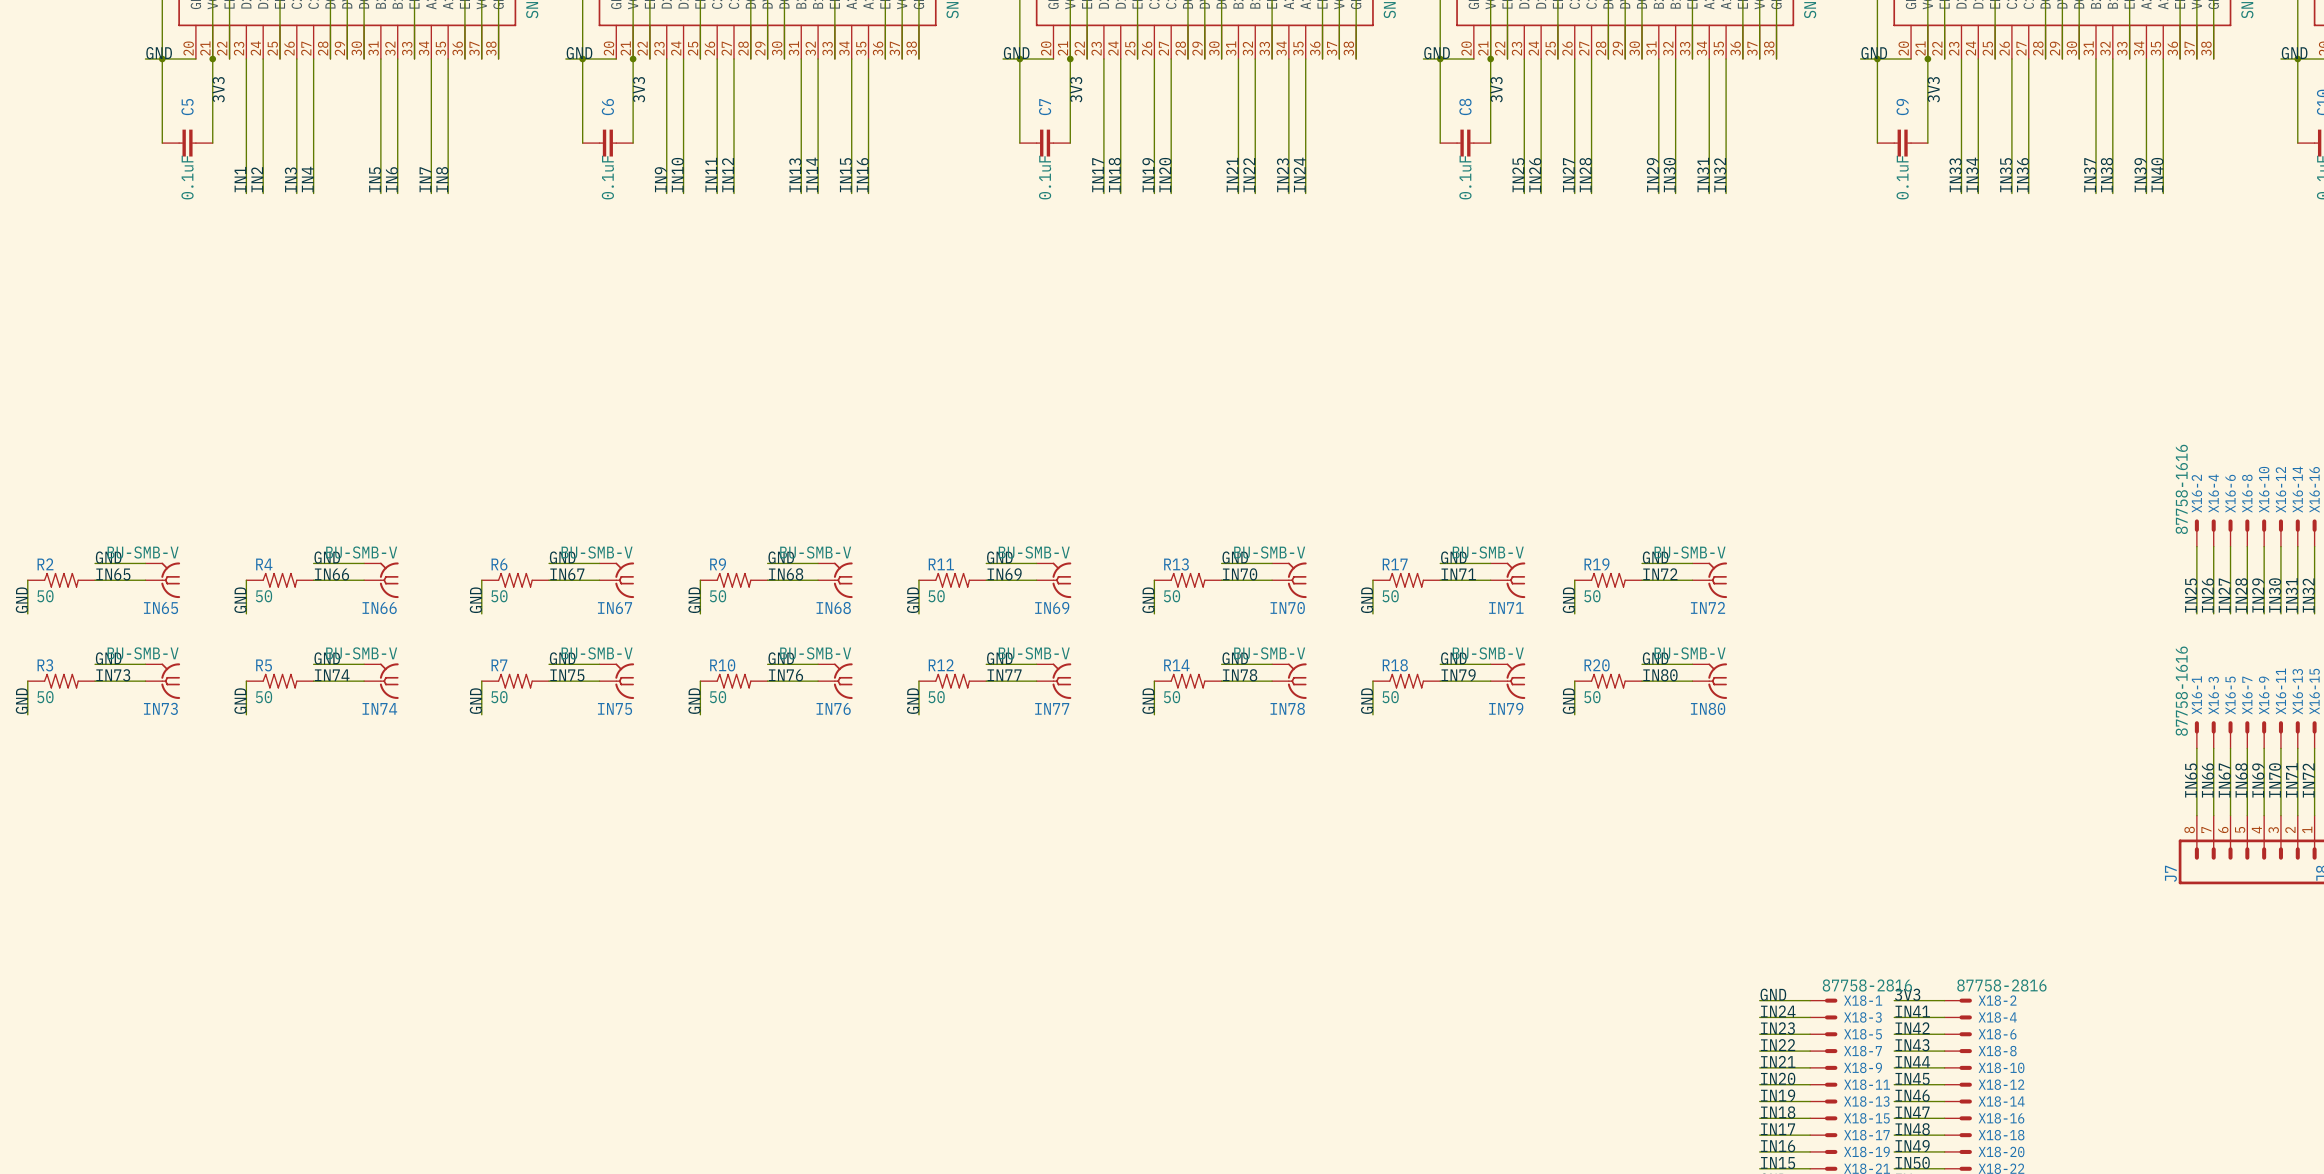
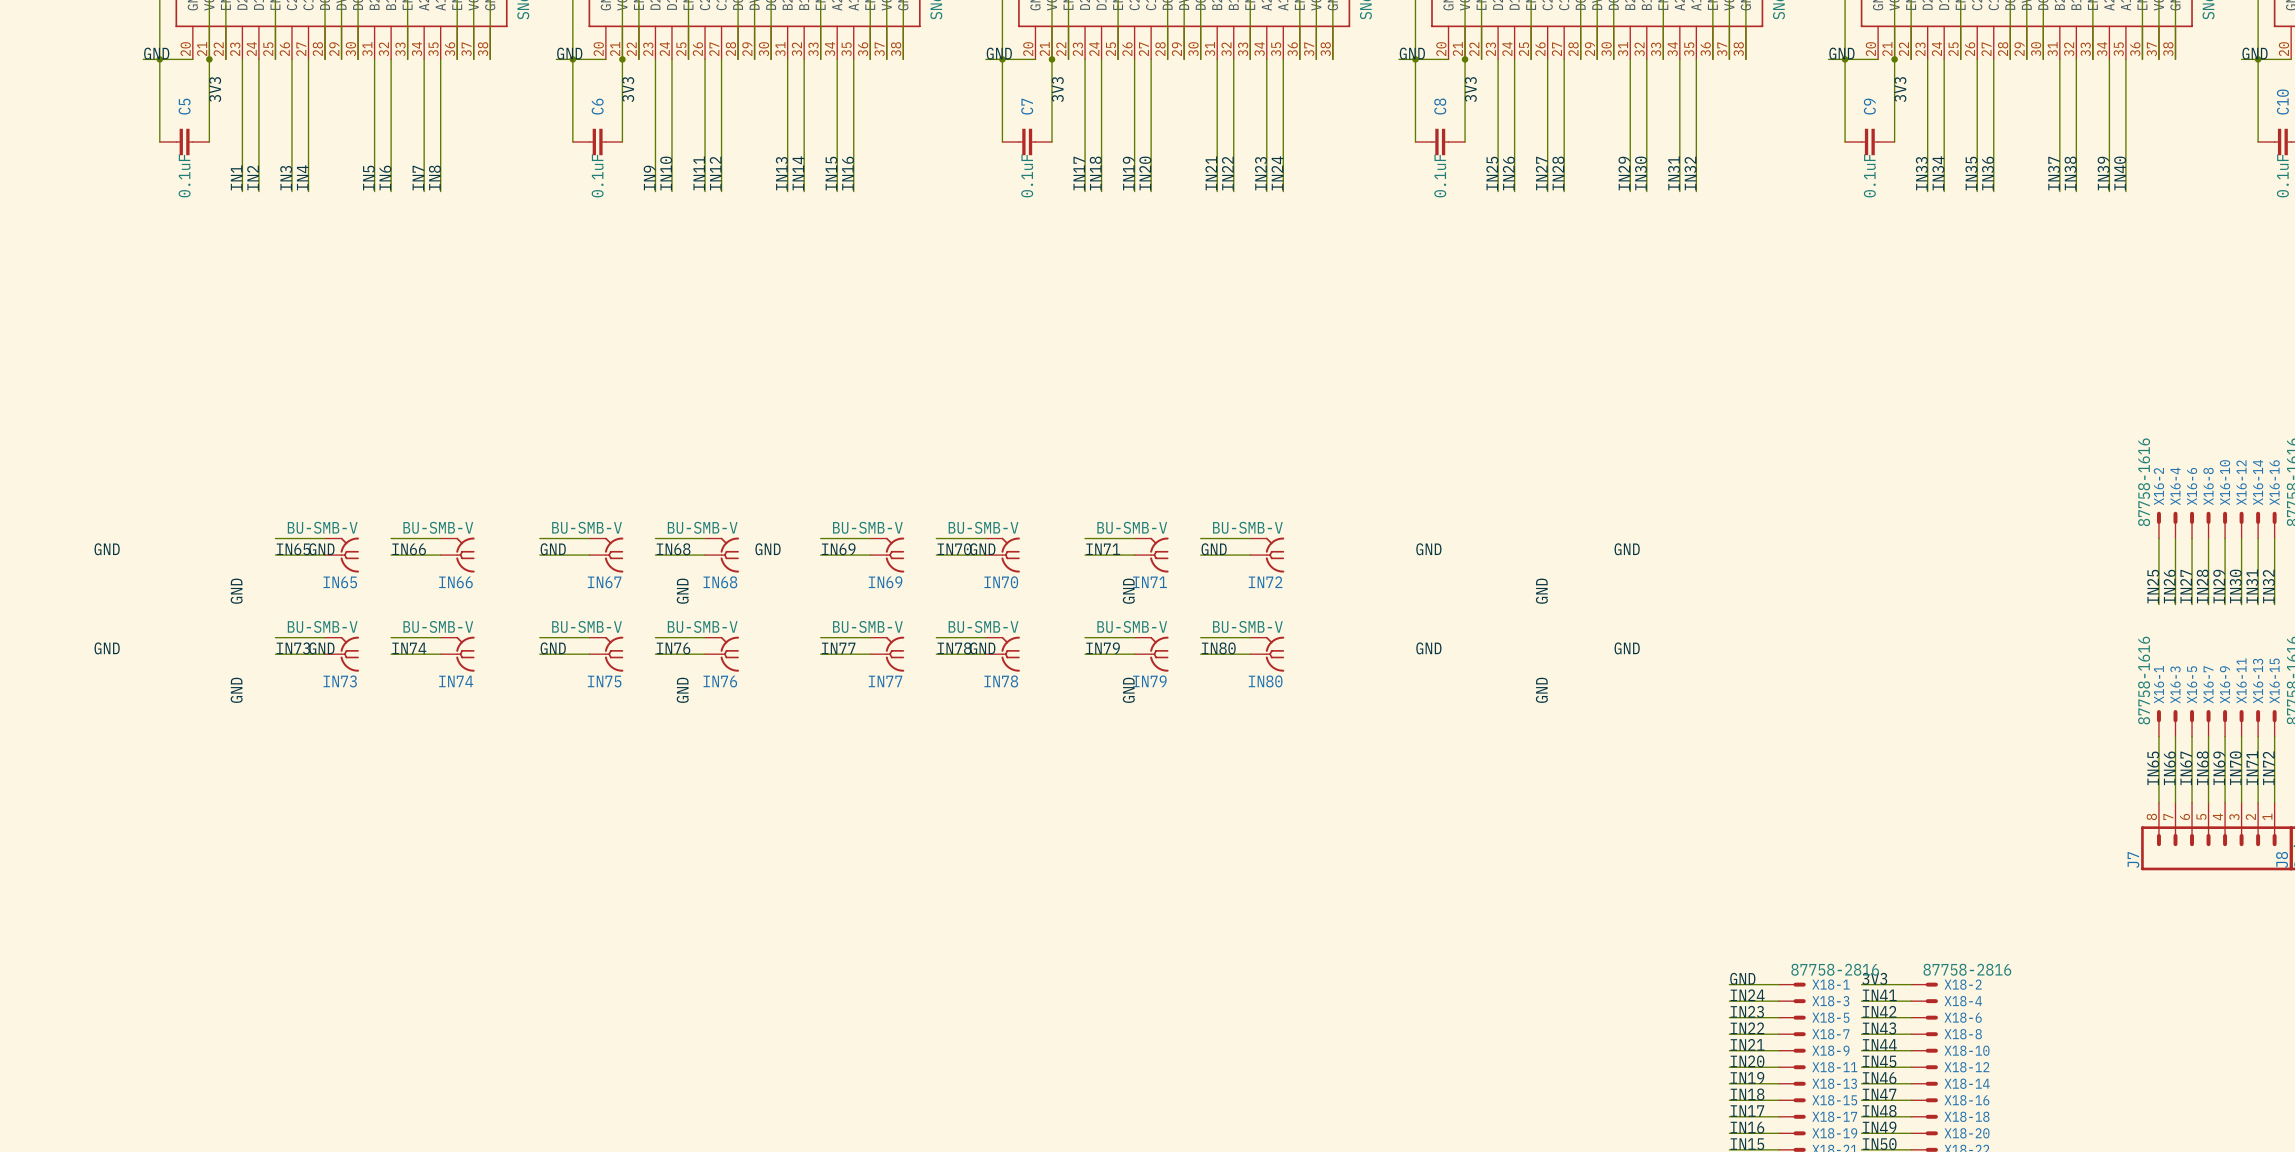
wire: none -> (391, 538) (440, 538)
wire: none -> (655, 538) (705, 538)
wire: none -> (1085, 538) (1134, 538)
label: none -> IN65 (293, 549)
label: none -> IN70 (954, 549)
label: none -> IN71 (1103, 549)
wire: (95, 563) (145, 563) -> none
wire: none -> (391, 555) (440, 555)
wire: none -> (655, 555) (705, 555)
wire: (767, 563) (818, 563) -> (820, 538) (870, 538)
wire: none -> (1085, 555) (1134, 555)
wire: (1440, 563) (1490, 563) -> none
wire: (1642, 563) (1692, 563) -> none
label: IN65 (113, 574) -> none
label position: IN66 (331, 574) -> IN66 (409, 549)
label: IN67 (567, 574) -> none
label position: IN68 (786, 574) -> IN68 (673, 549)
label position: IN69 (1004, 574) -> IN69 (838, 549)
label: IN70 (1240, 574) -> none
label: IN71 (1458, 574) -> none
label: IN72 (1660, 574) -> none
wire: (27, 580) (27, 613) -> none
R2: 50 (61, 580) -> none
wire: (95, 580) (145, 580) -> none
IN65 position: (162, 580) -> (342, 555)
wire: (246, 580) (246, 613) -> none
R4: 50 (280, 580) -> none
wire: (313, 580) (364, 580) -> (275, 538) (325, 538)
IN66 position: (381, 580) -> (457, 555)
wire: (481, 580) (481, 613) -> none
R6: 50 (515, 580) -> none
wire: (549, 580) (599, 580) -> (539, 538) (589, 538)
IN67 position: (616, 580) -> (606, 555)
wire: (700, 580) (700, 613) -> none
R9: 50 (734, 580) -> none
wire: (767, 580) (818, 580) -> (820, 555) (870, 555)
IN68 position: (835, 580) -> (722, 555)
wire: (918, 580) (918, 613) -> none
R11: 50 (952, 580) -> none
wire: (986, 580) (1036, 580) -> (936, 538) (985, 538)
IN69 position: (1053, 580) -> (887, 555)
wire: (1154, 580) (1154, 613) -> none
R13: 50 (1188, 580) -> none
wire: (1221, 580) (1272, 580) -> (1200, 538) (1250, 538)
IN70 position: (1289, 580) -> (1002, 555)
wire: (1372, 580) (1372, 613) -> none
R17: 50 (1406, 580) -> none
wire: (1440, 580) (1490, 580) -> none
IN71 position: (1507, 580) -> (1151, 555)
wire: (1574, 580) (1574, 613) -> none
R19: 50 (1608, 580) -> none
wire: (1642, 580) (1692, 580) -> none
IN72 position: (1709, 580) -> (1267, 555)
label: GND (21, 600) -> none
label: GND (475, 600) -> none
label: GND (913, 600) -> none
label: GND (1367, 600) -> none
wire: none -> (391, 637) (440, 637)
wire: none -> (655, 637) (705, 637)
wire: none -> (1085, 637) (1134, 637)
label: none -> IN73 (293, 648)
label: GND (781, 658) -> none
label: none -> IN78 (954, 648)
label: none -> IN79 (1103, 648)
label: GND (1235, 658) -> IN80 (1218, 648)
wire: (95, 664) (145, 664) -> none
wire: none -> (391, 654) (440, 654)
wire: none -> (655, 654) (705, 654)
wire: (767, 664) (818, 664) -> (820, 637) (870, 637)
wire: none -> (1085, 654) (1134, 654)
wire: (1440, 664) (1490, 664) -> none
wire: (1642, 664) (1692, 664) -> none
label: IN73 (113, 675) -> none
label position: IN74 (332, 675) -> IN74 (409, 648)
label: IN75 (567, 675) -> none
label position: IN76 (785, 675) -> IN76 (673, 648)
label position: IN77 (1004, 675) -> IN77 (838, 648)
label: IN78 (1240, 675) -> none
label: IN79 (1458, 675) -> none
label: IN80 (1660, 675) -> none
wire: (27, 681) (27, 714) -> none
R3: 50 (61, 681) -> none
wire: (95, 681) (145, 681) -> none
IN73 position: (162, 681) -> (342, 654)
wire: (246, 681) (246, 714) -> none
R5: 50 (280, 681) -> none
wire: (313, 681) (364, 681) -> (275, 637) (325, 637)
IN74 position: (381, 681) -> (457, 654)
wire: (481, 681) (481, 714) -> none
R7: 50 (515, 681) -> none
wire: (549, 681) (599, 681) -> (539, 637) (589, 637)
IN75 position: (616, 681) -> (606, 654)
wire: (700, 681) (700, 714) -> none
R10: 50 (734, 681) -> none
wire: (767, 681) (818, 681) -> (820, 654) (870, 654)
IN76 position: (835, 681) -> (722, 654)
wire: (918, 681) (918, 714) -> none
R12: 50 (952, 681) -> none
wire: (986, 681) (1036, 681) -> (936, 637) (985, 637)
IN77 position: (1053, 681) -> (887, 654)
wire: (1154, 681) (1154, 714) -> none
R14: 50 (1188, 681) -> none
wire: (1221, 681) (1272, 681) -> (1200, 637) (1250, 637)
IN78 position: (1289, 681) -> (1002, 654)
wire: (1372, 681) (1372, 714) -> none
R18: 50 (1406, 681) -> none
wire: (1440, 681) (1490, 681) -> none
IN79 position: (1507, 681) -> (1151, 654)
wire: (1574, 681) (1574, 714) -> none
R20: 50 (1608, 681) -> none
wire: (1642, 681) (1692, 681) -> none
IN80 position: (1709, 681) -> (1267, 654)
label: GND (21, 701) -> none
label: GND (475, 701) -> none
label: GND (913, 701) -> none
label: GND (1367, 701) -> none

